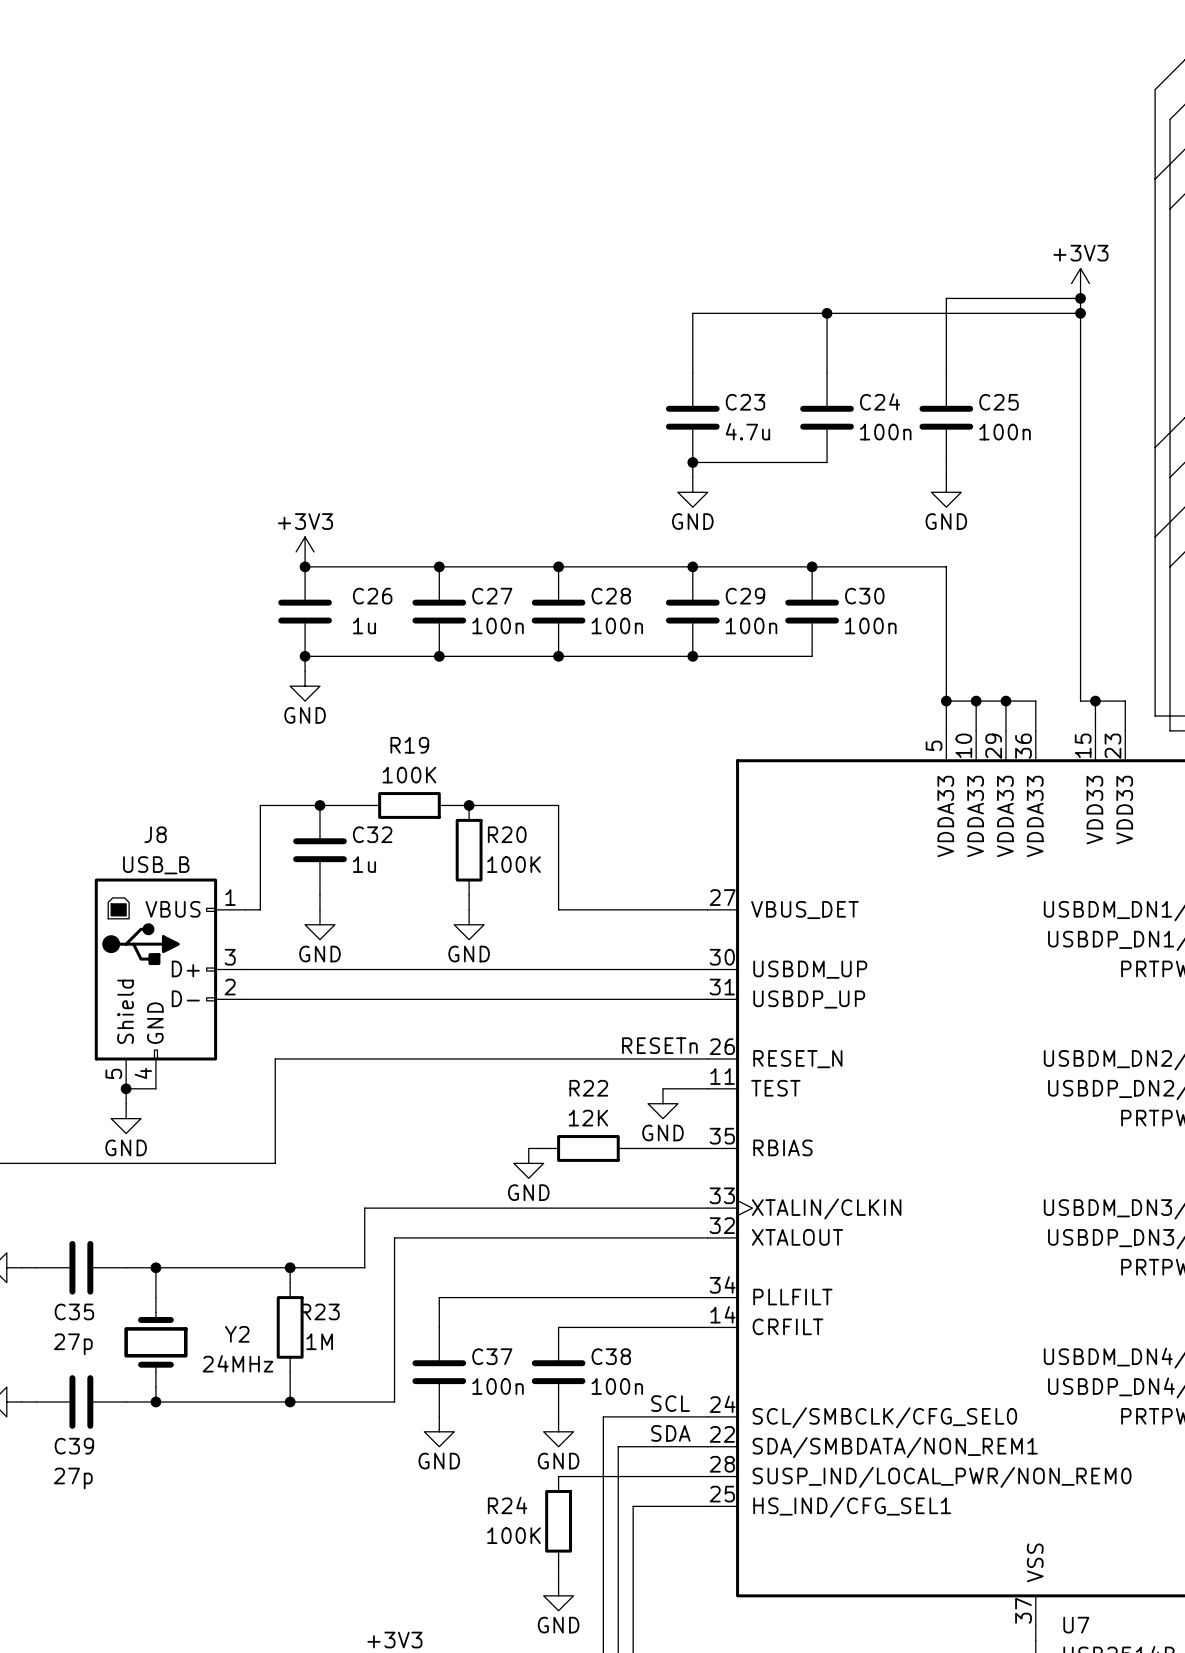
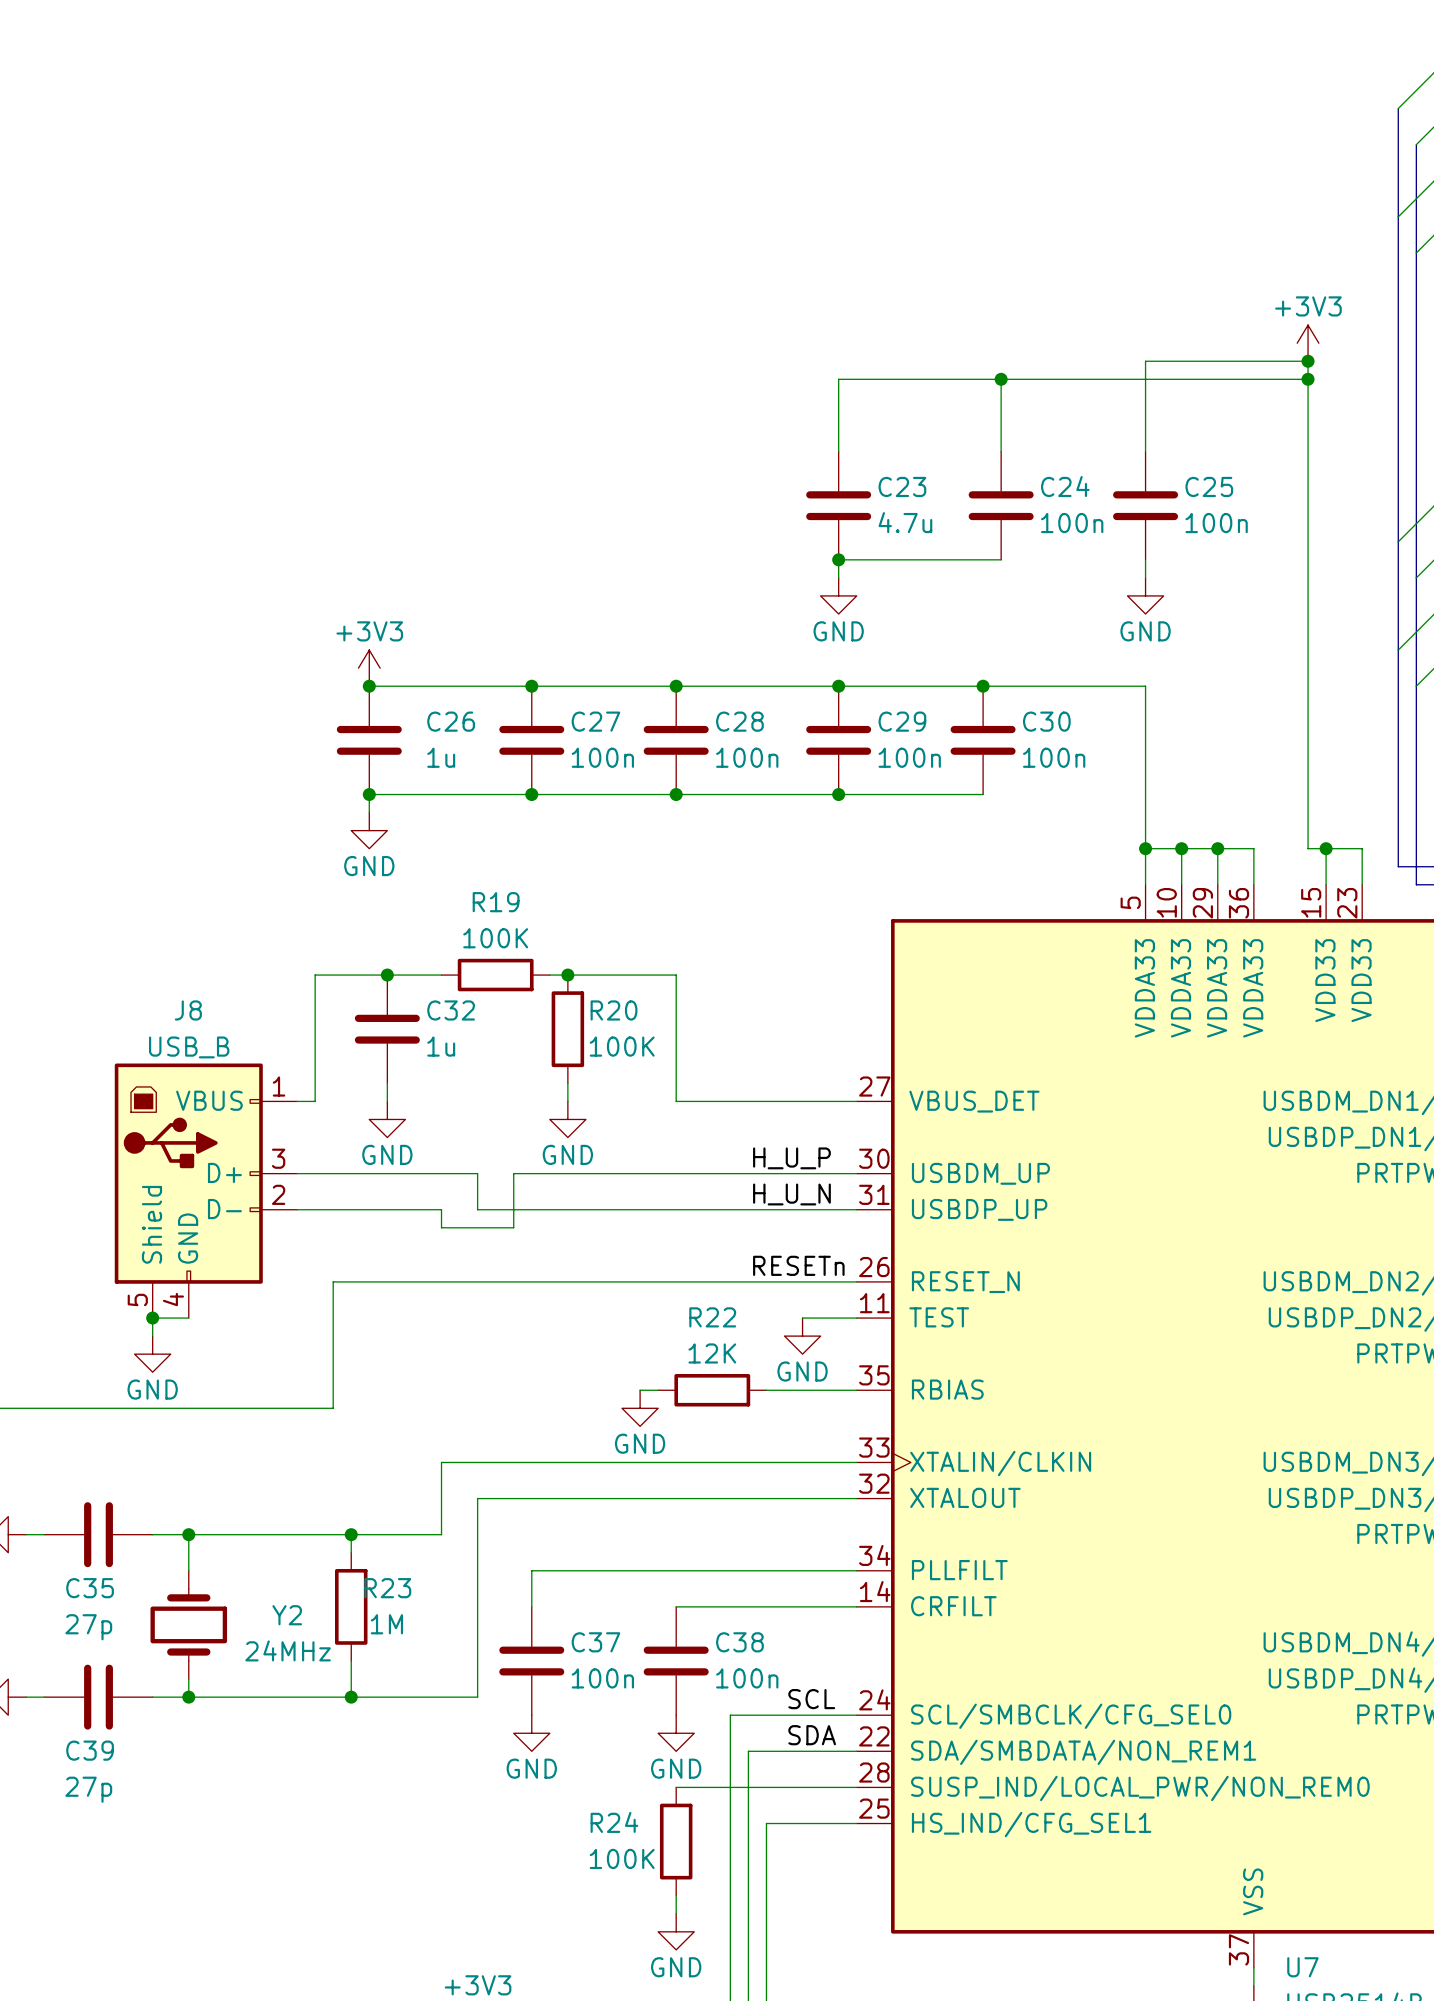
label: none -> H_U_P (791, 1158)
wire: (394, 969) (424, 969) -> (441, 1209) (441, 1227) (513, 1227) (513, 1173)
label: none -> H_U_N (791, 1194)
wire: (364, 999) (394, 999) -> (477, 1173) (477, 1209)

